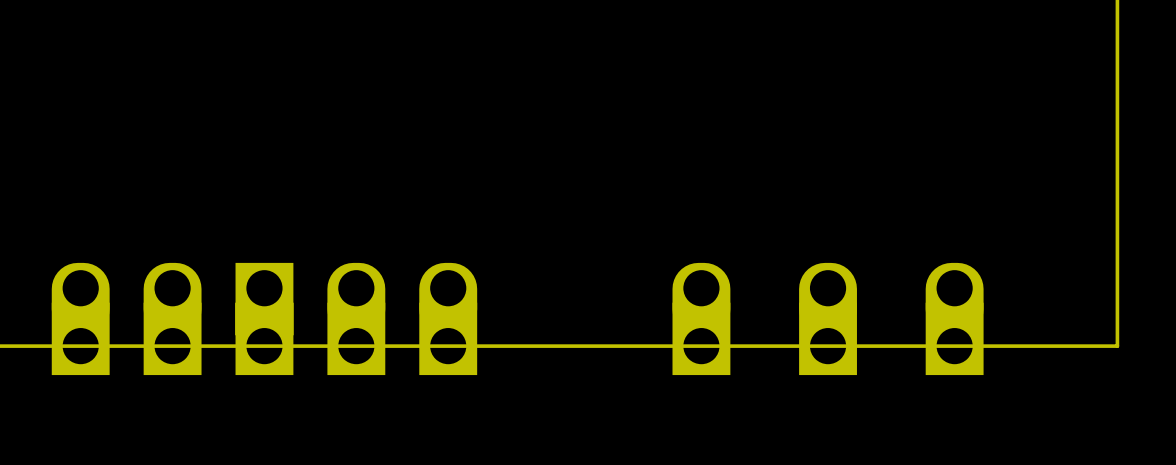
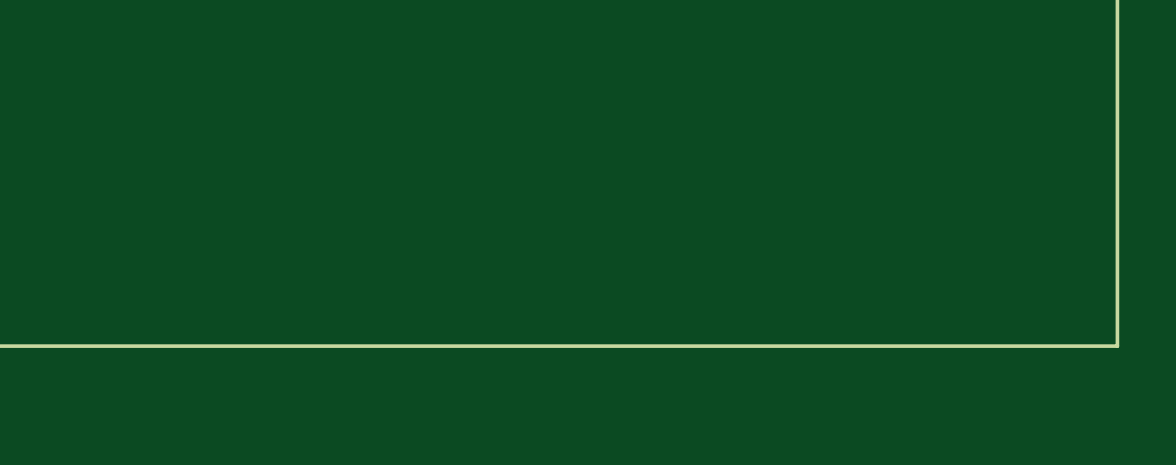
part: (264, 318) -> none
part: (701, 318) -> none
part: (828, 318) -> none
part: (954, 318) -> none

